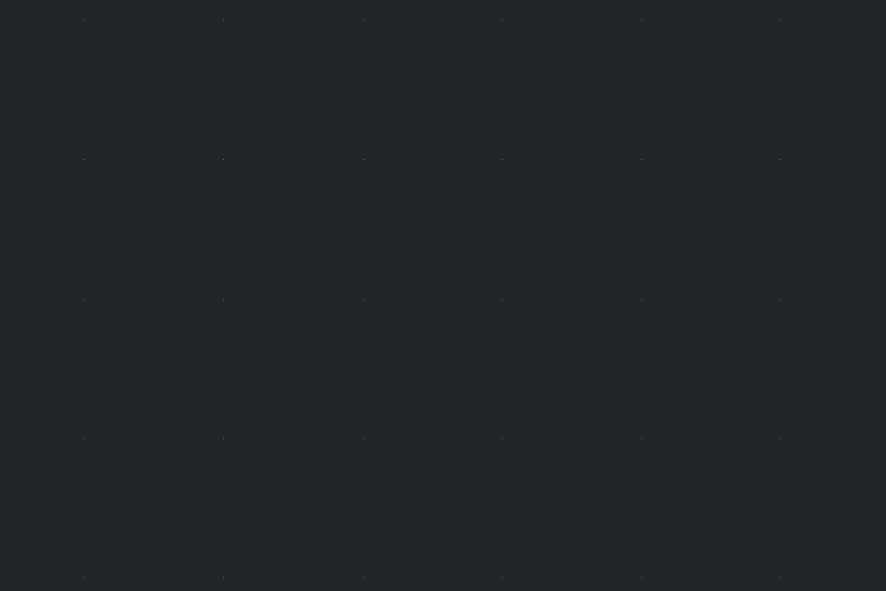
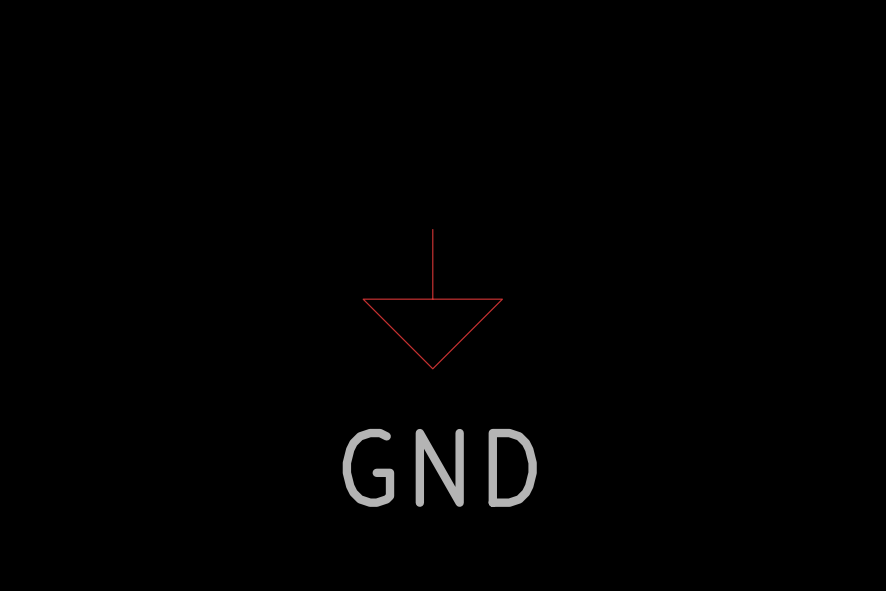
power symbol: none -> GND (432, 299)

